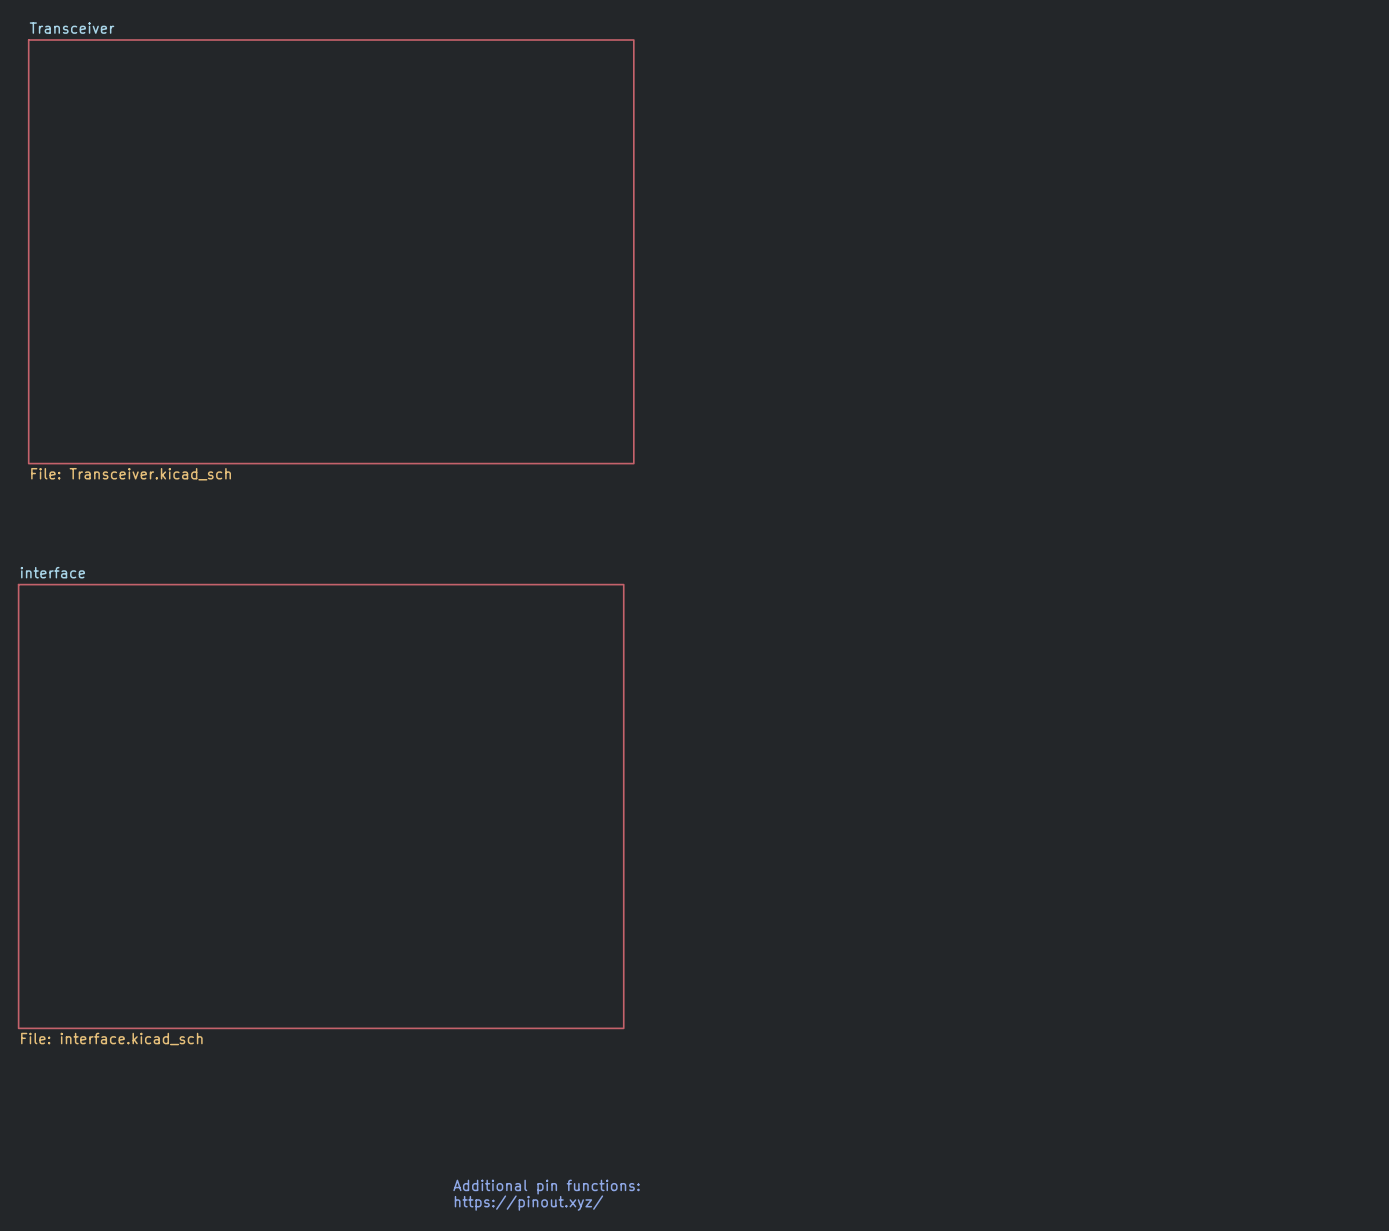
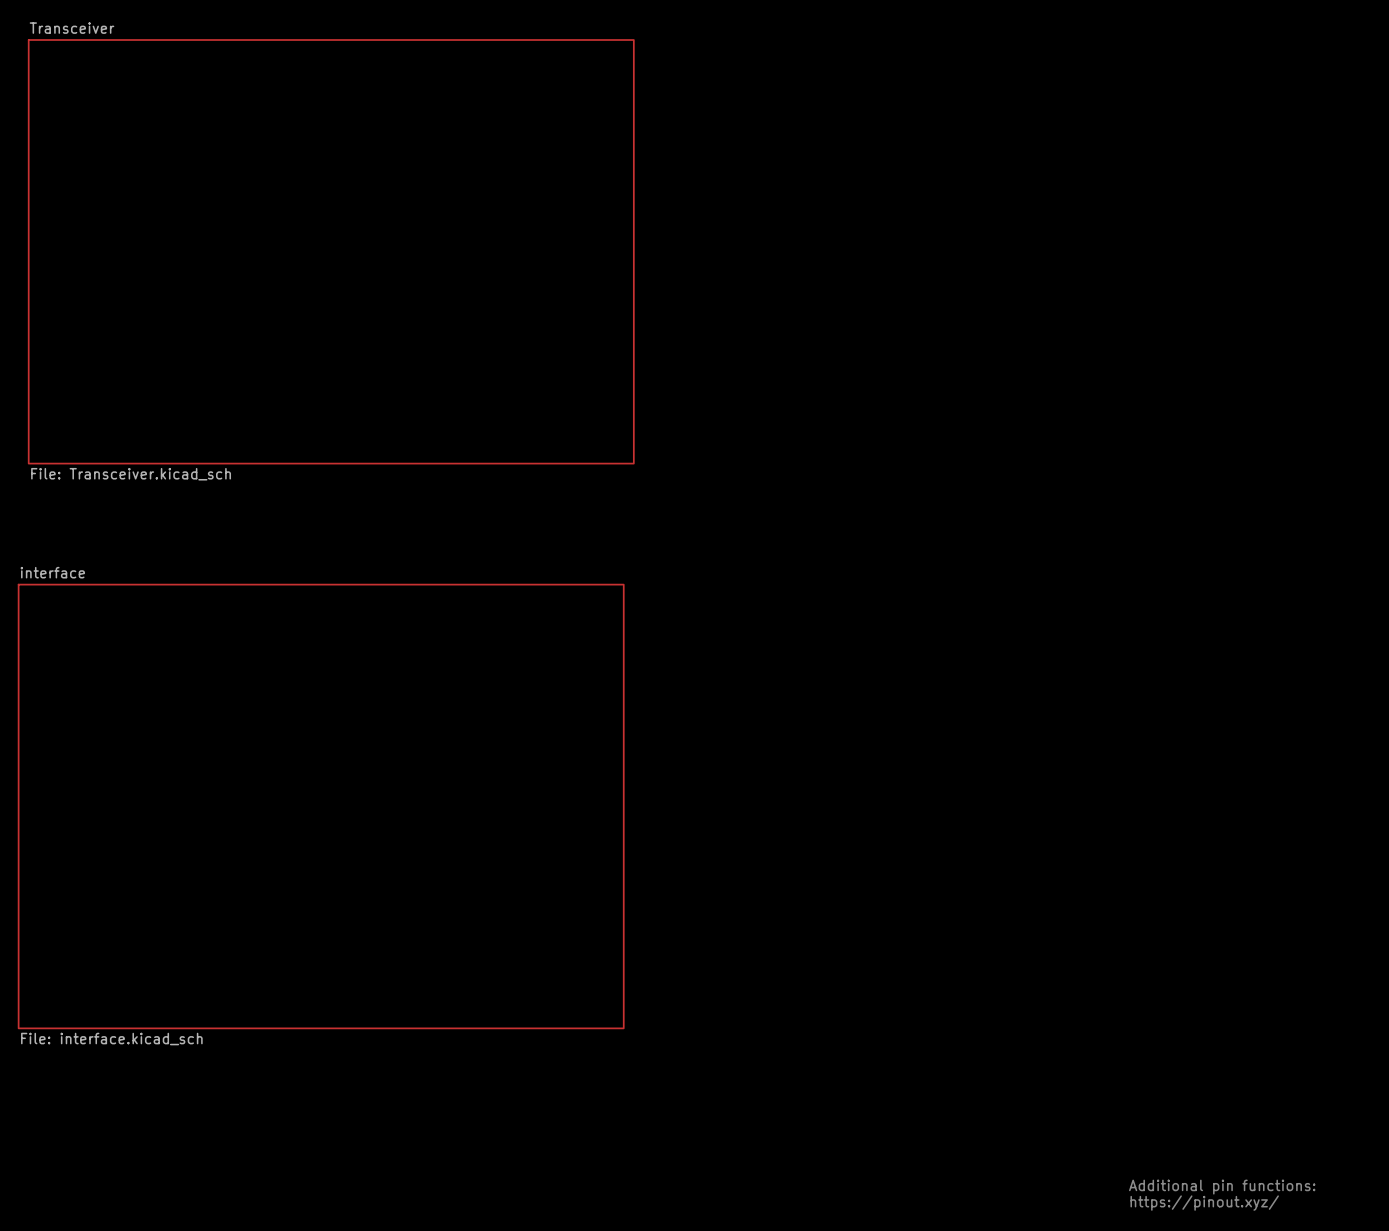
text: Additional pin functions: (546, 1187) -> none
text: none -> Additional pin functions: (1222, 1187)
text: https://pinout.xyz/ (528, 1203) -> none
text: none -> https://pinout.xyz/ (1204, 1203)

